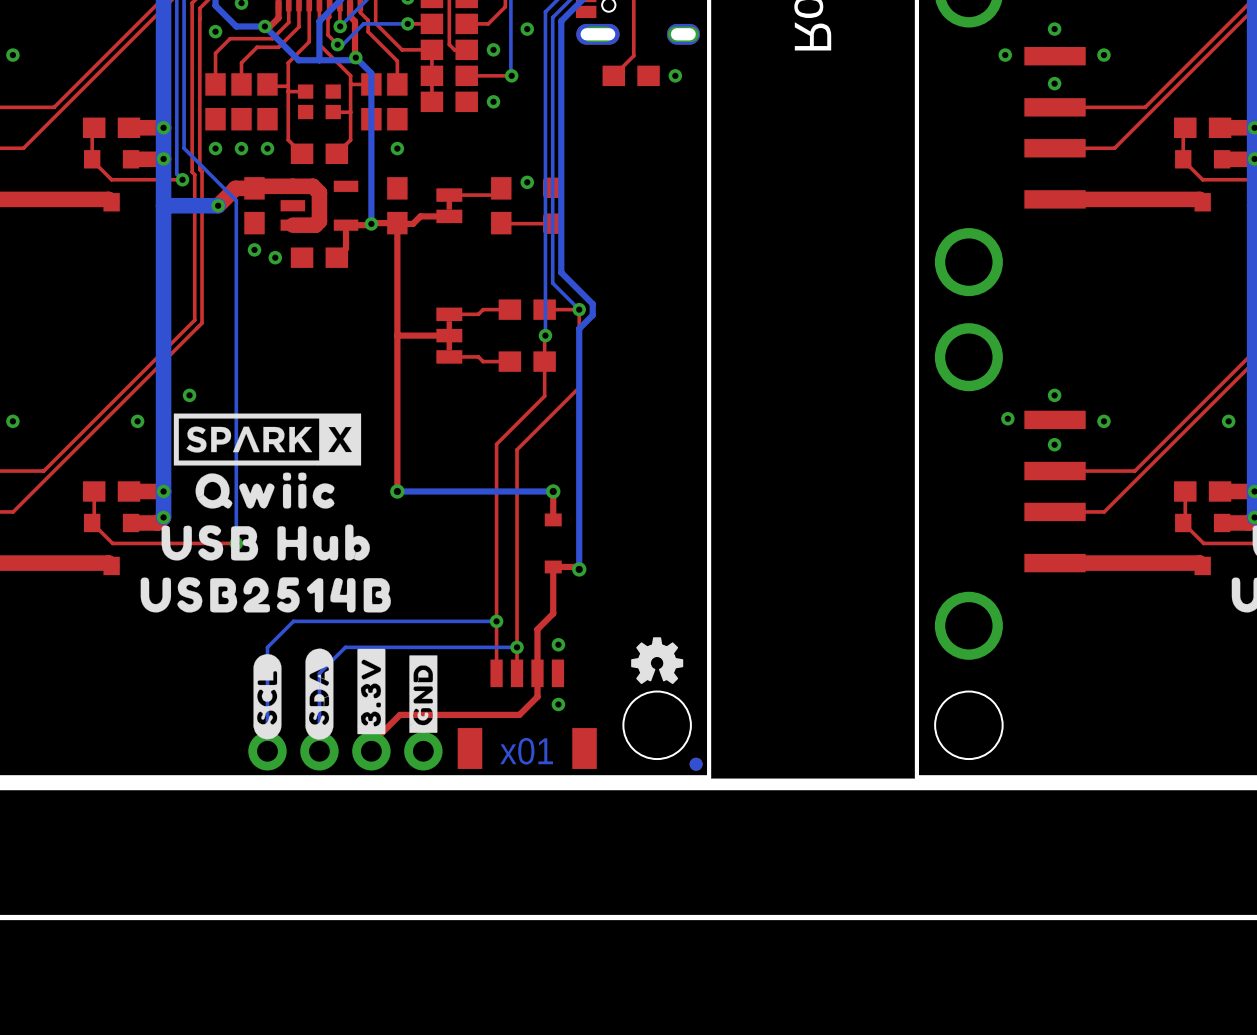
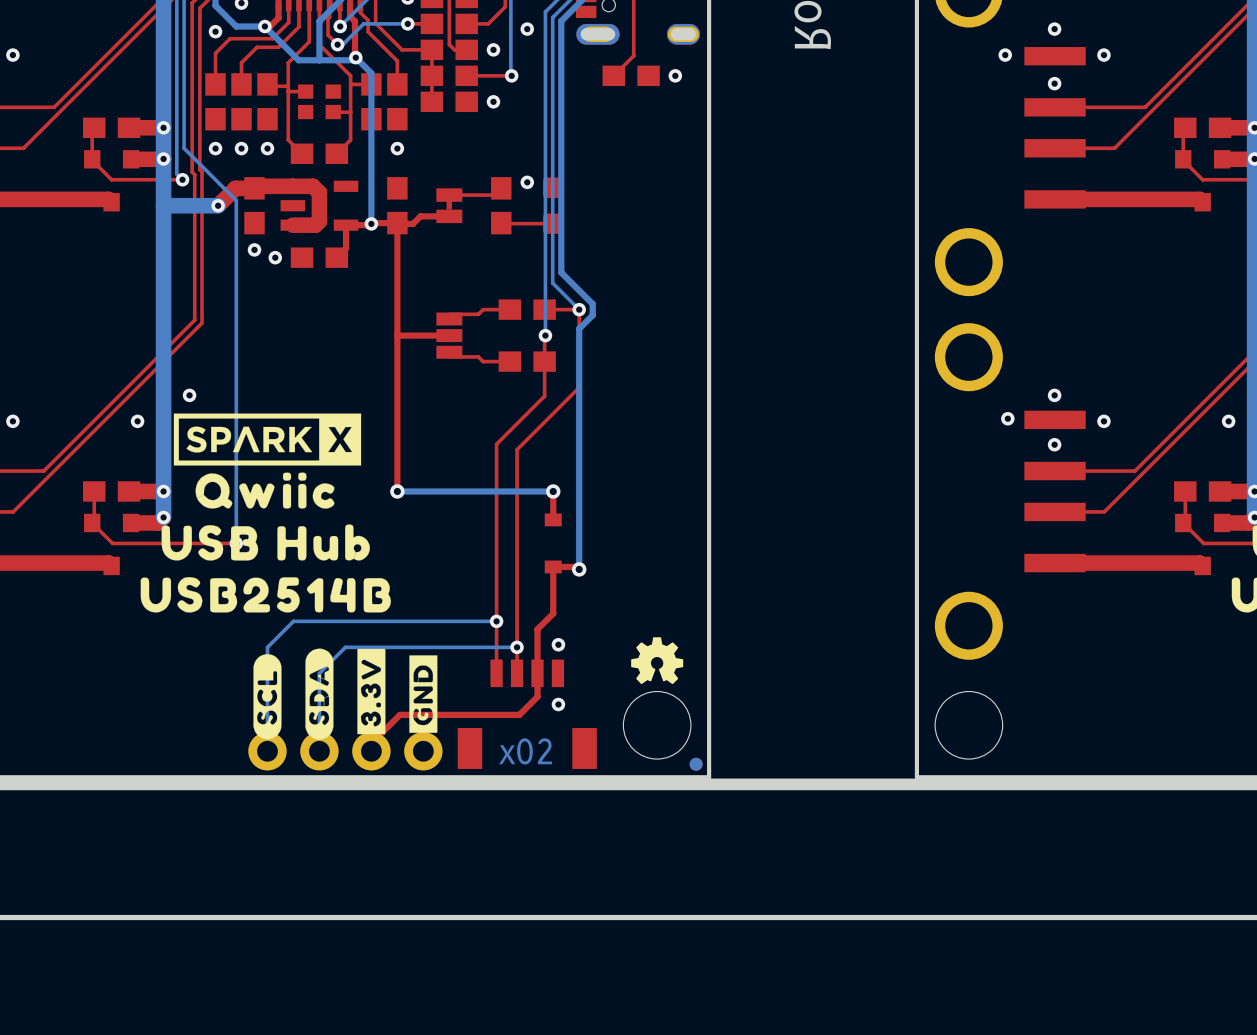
part footprint: [436, 307, 463, 364] -> [436, 312, 463, 359]
text: x01 (526, 751) -> x02 (525, 751)

